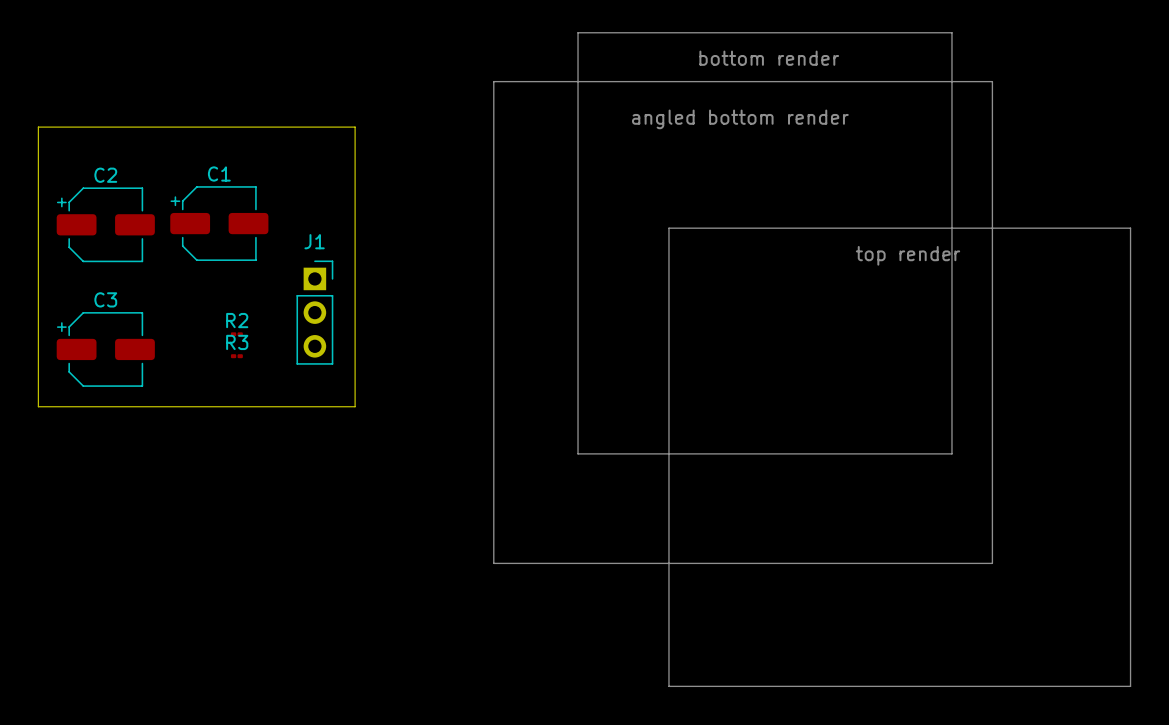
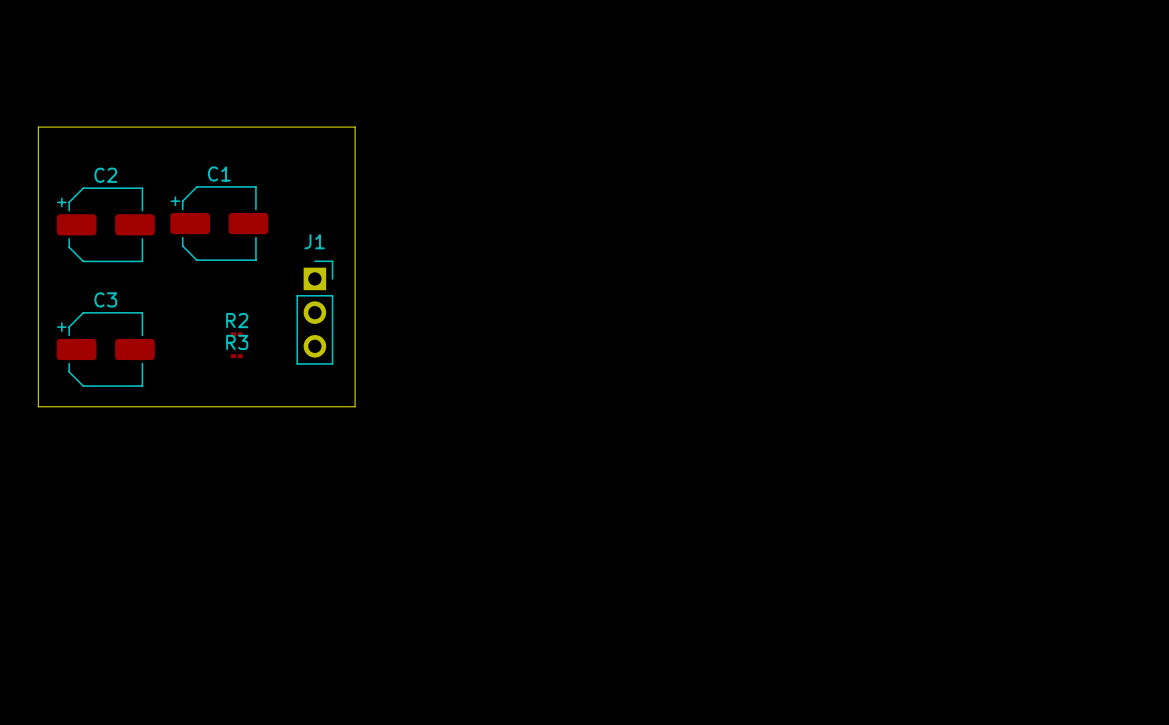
line: (578, 32) (951, 32) (951, 453) (578, 453) (578, 32) -> none
text: bottom render (769, 58) -> none
line: (493, 81) (992, 81) (992, 563) (493, 563) (493, 81) -> none
text: angled bottom render (740, 119) -> none
line: (668, 228) (1130, 228) (1130, 686) (668, 686) (668, 228) -> none
text: top render (908, 255) -> none

